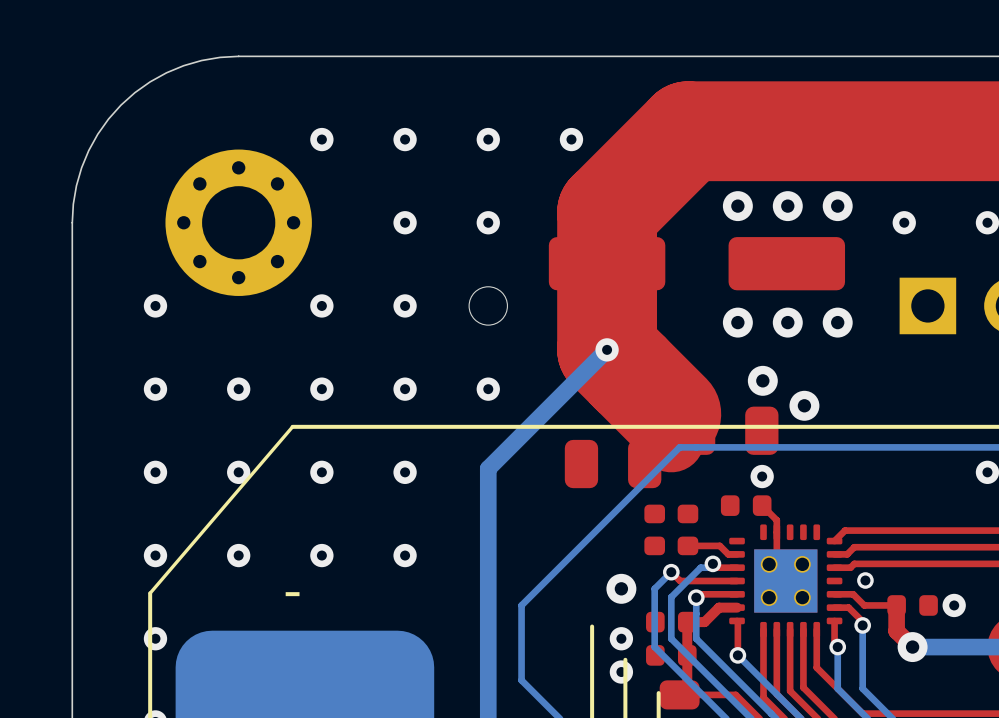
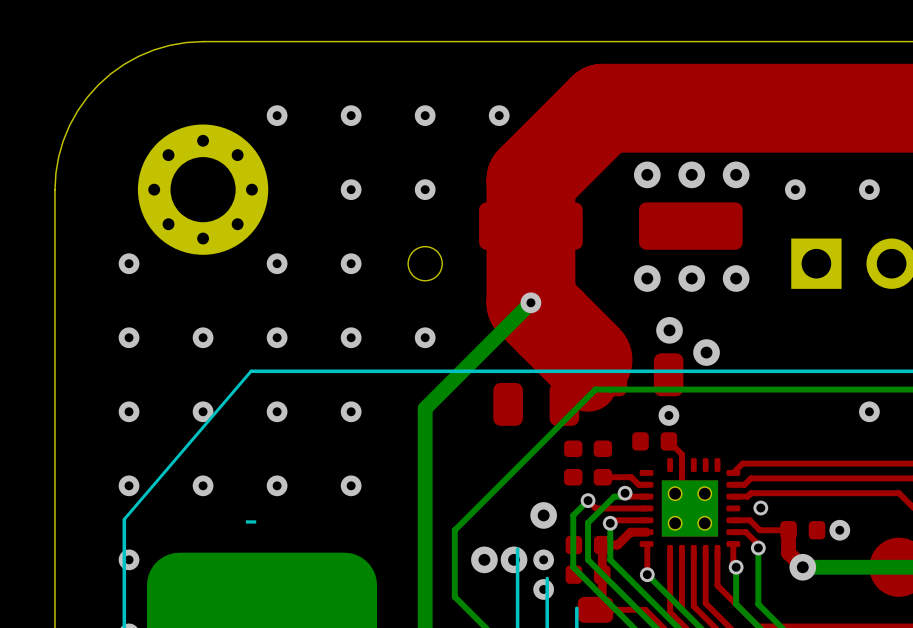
via: none -> (484, 559)
via: none -> (514, 559)

